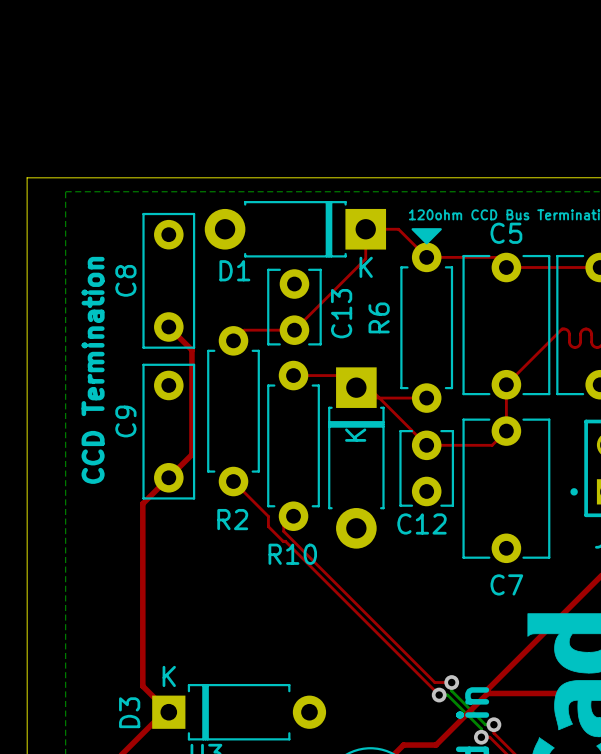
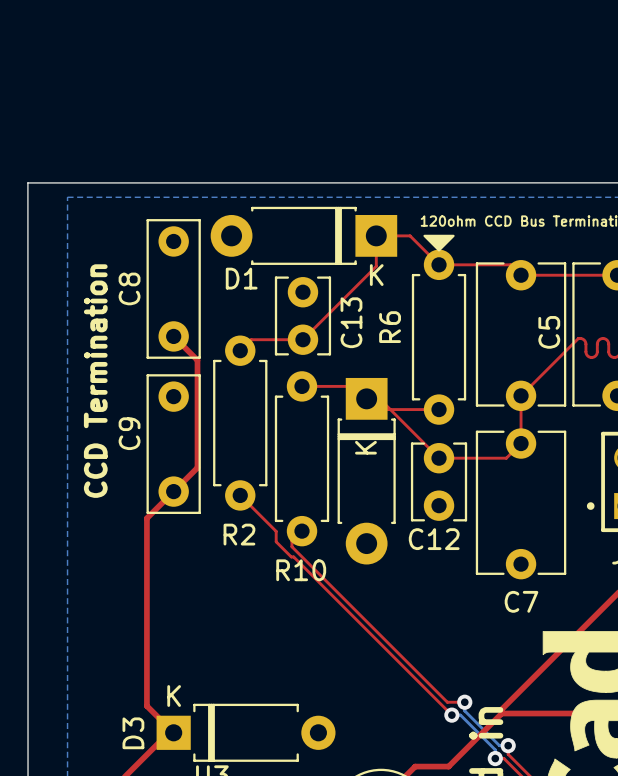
C5 name rotation: 0° (506, 233) -> 90° counterclockwise (549, 332)
C5 name position: C5 (506, 233) -> C5 (549, 332)

